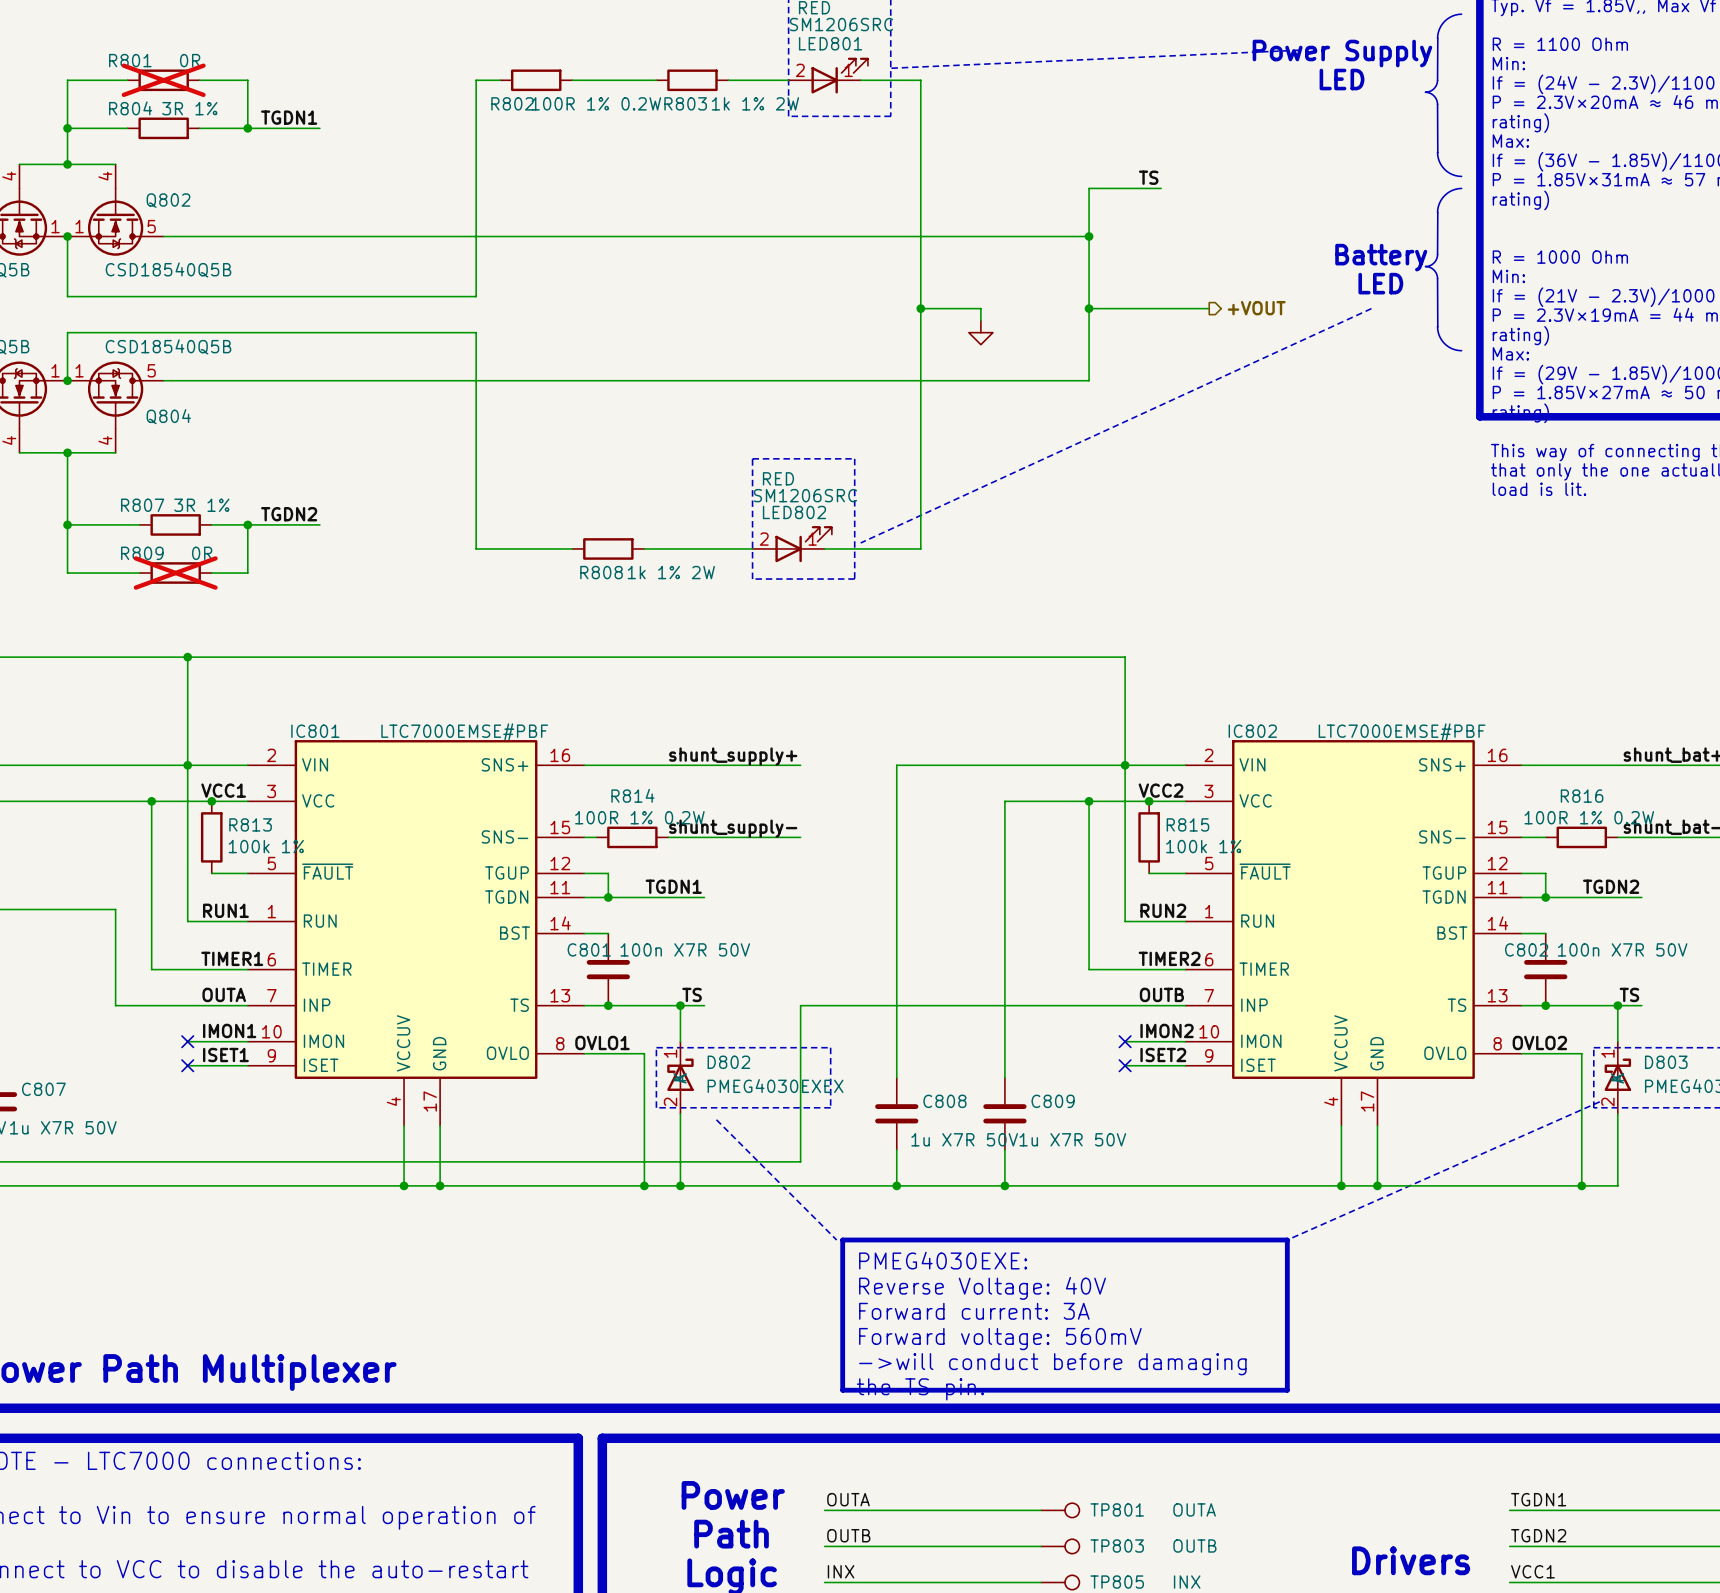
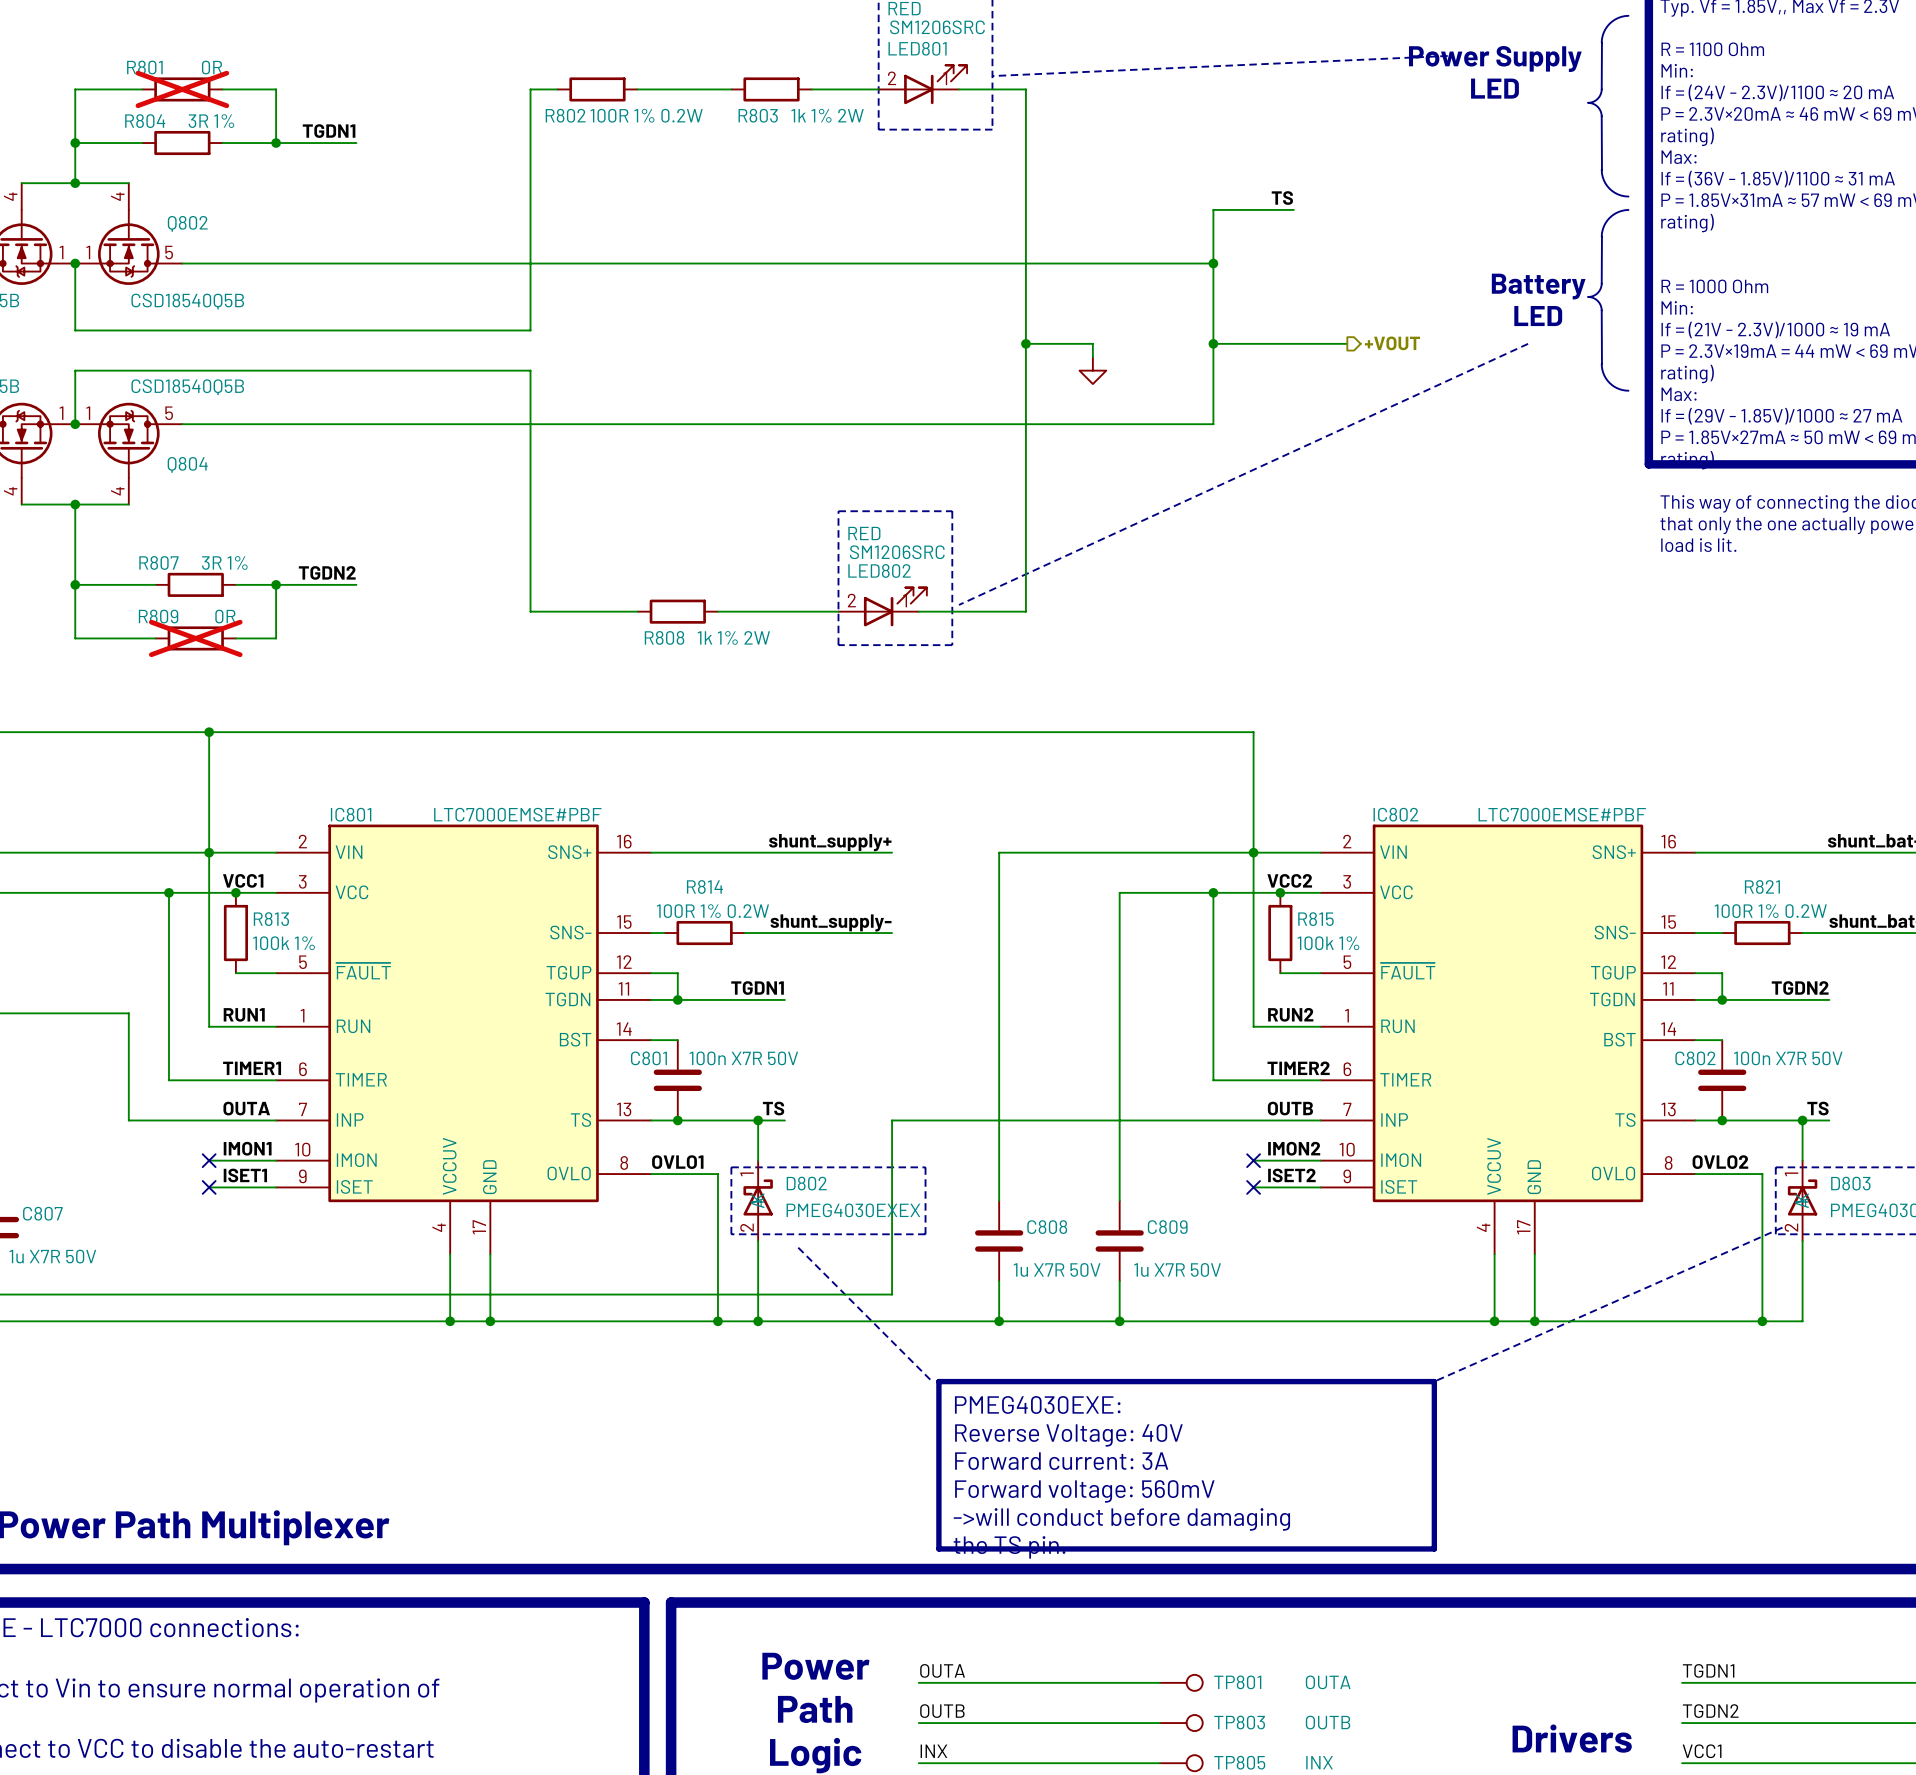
R816 name: R816 (1582, 796) -> R821 (1762, 886)

